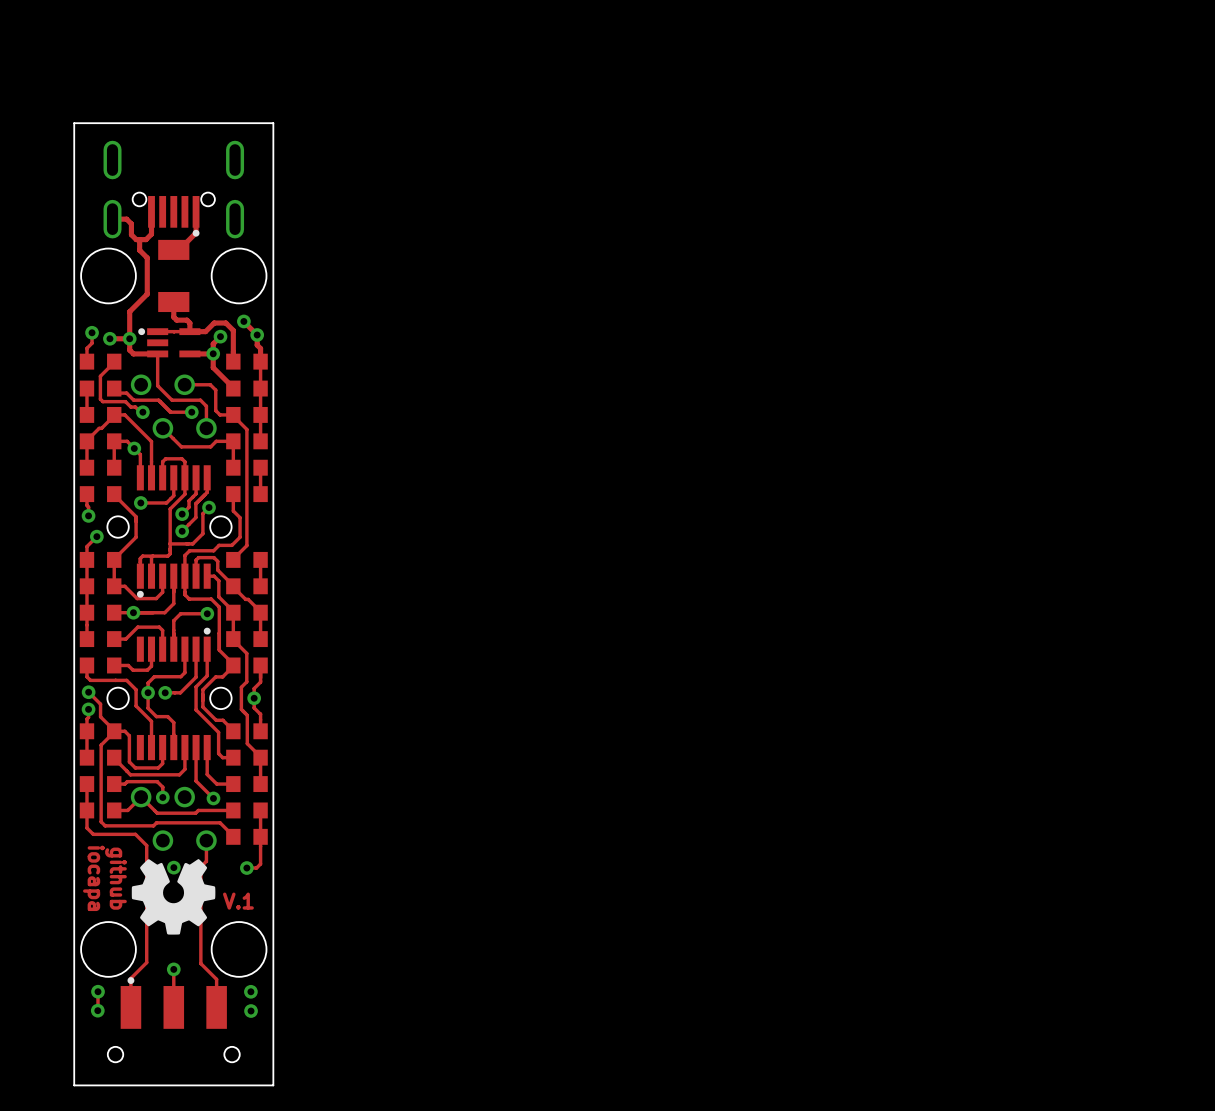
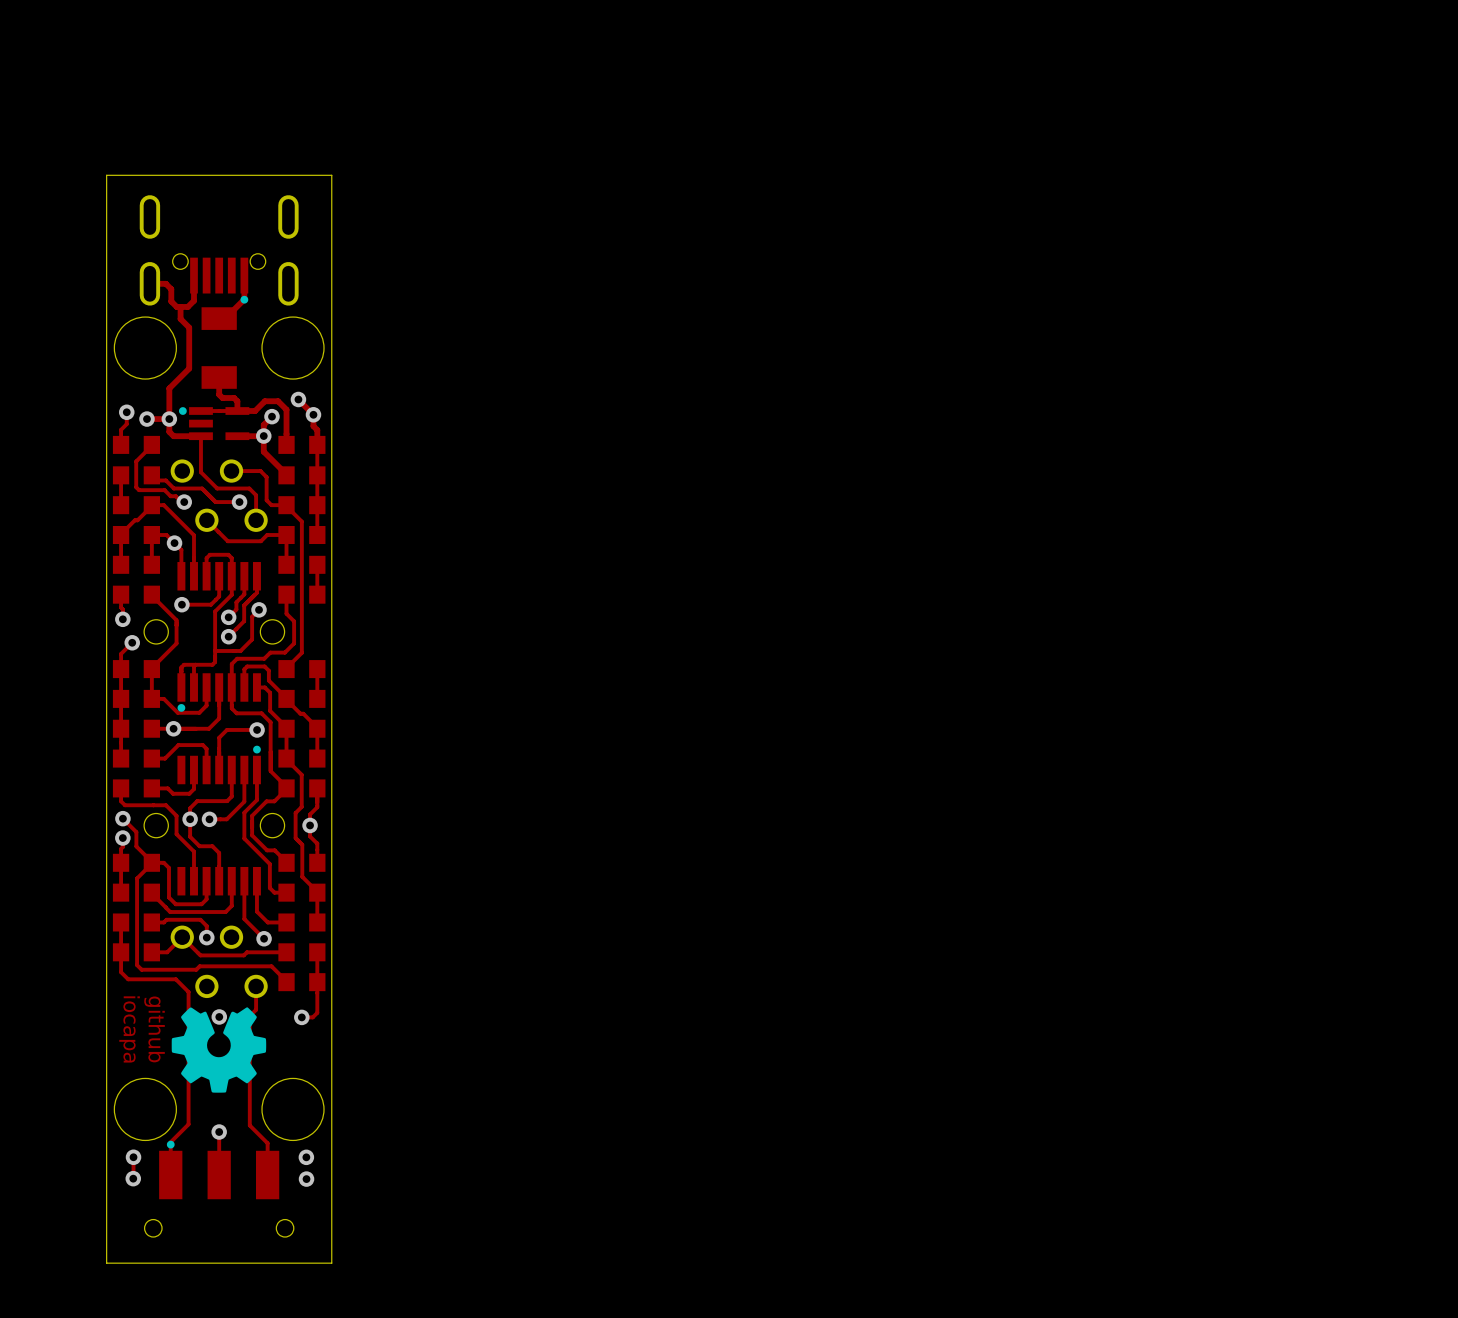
text: V.1 (238, 901) -> none

